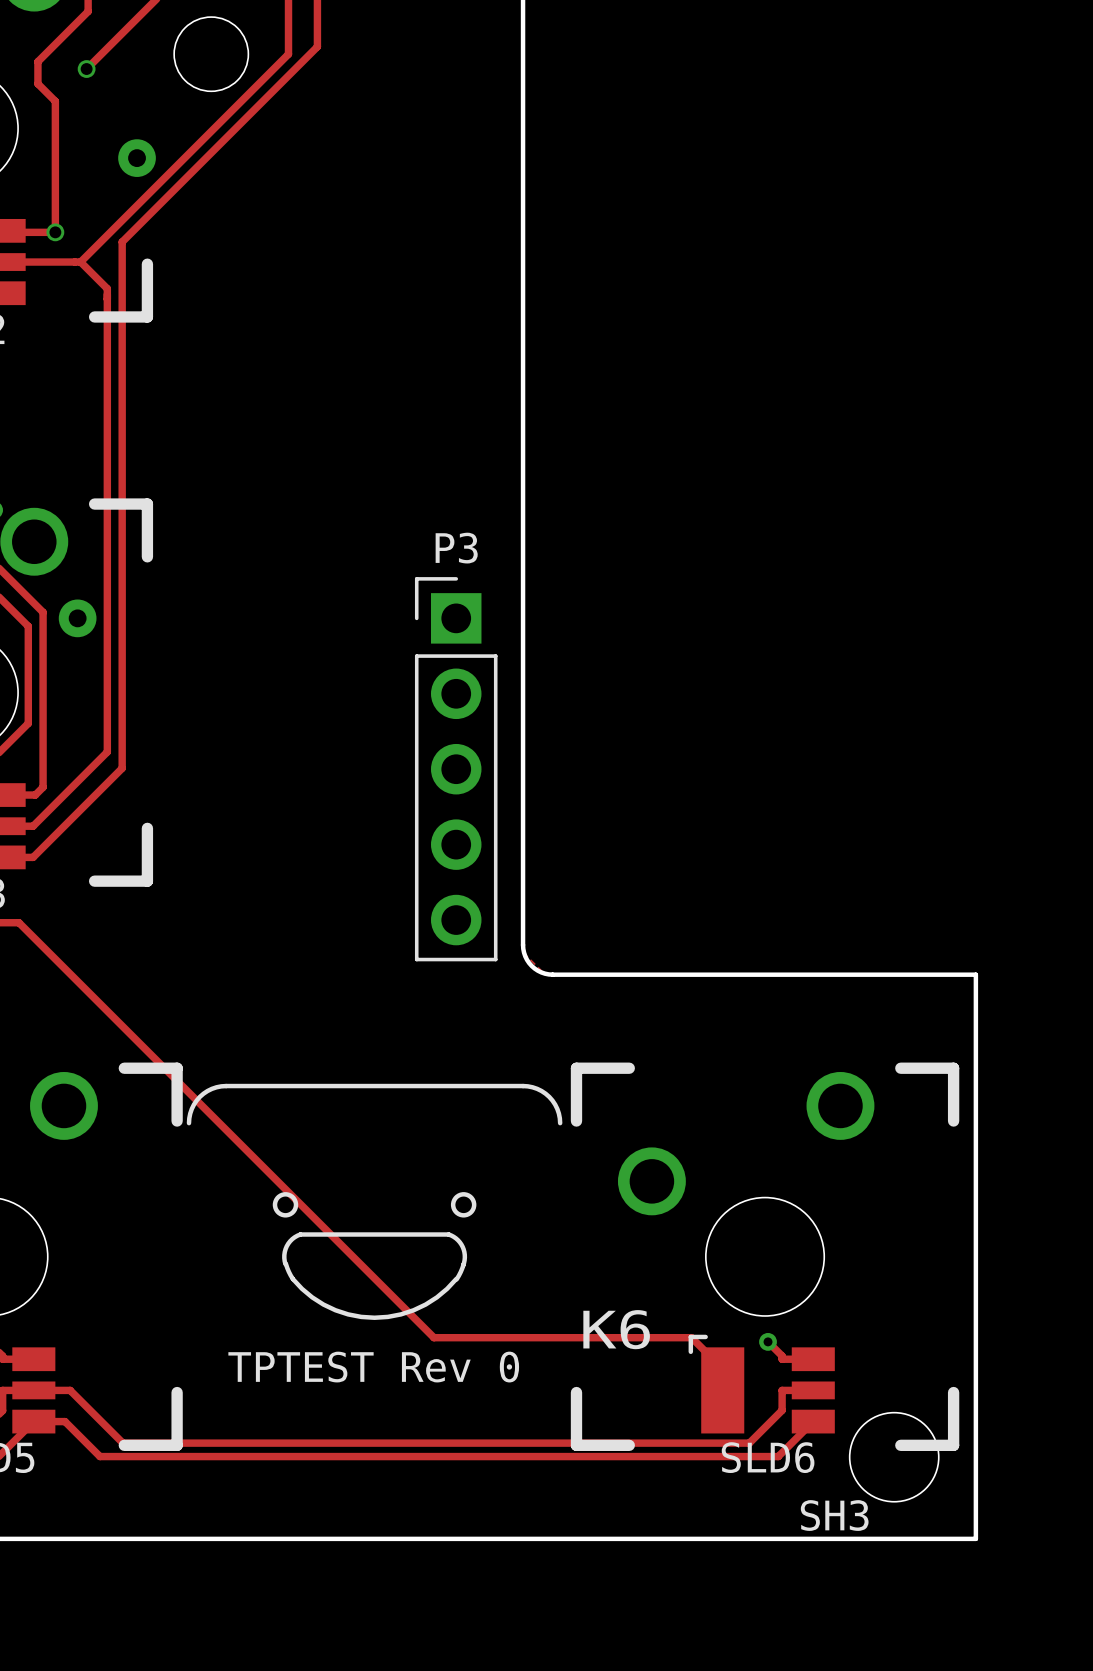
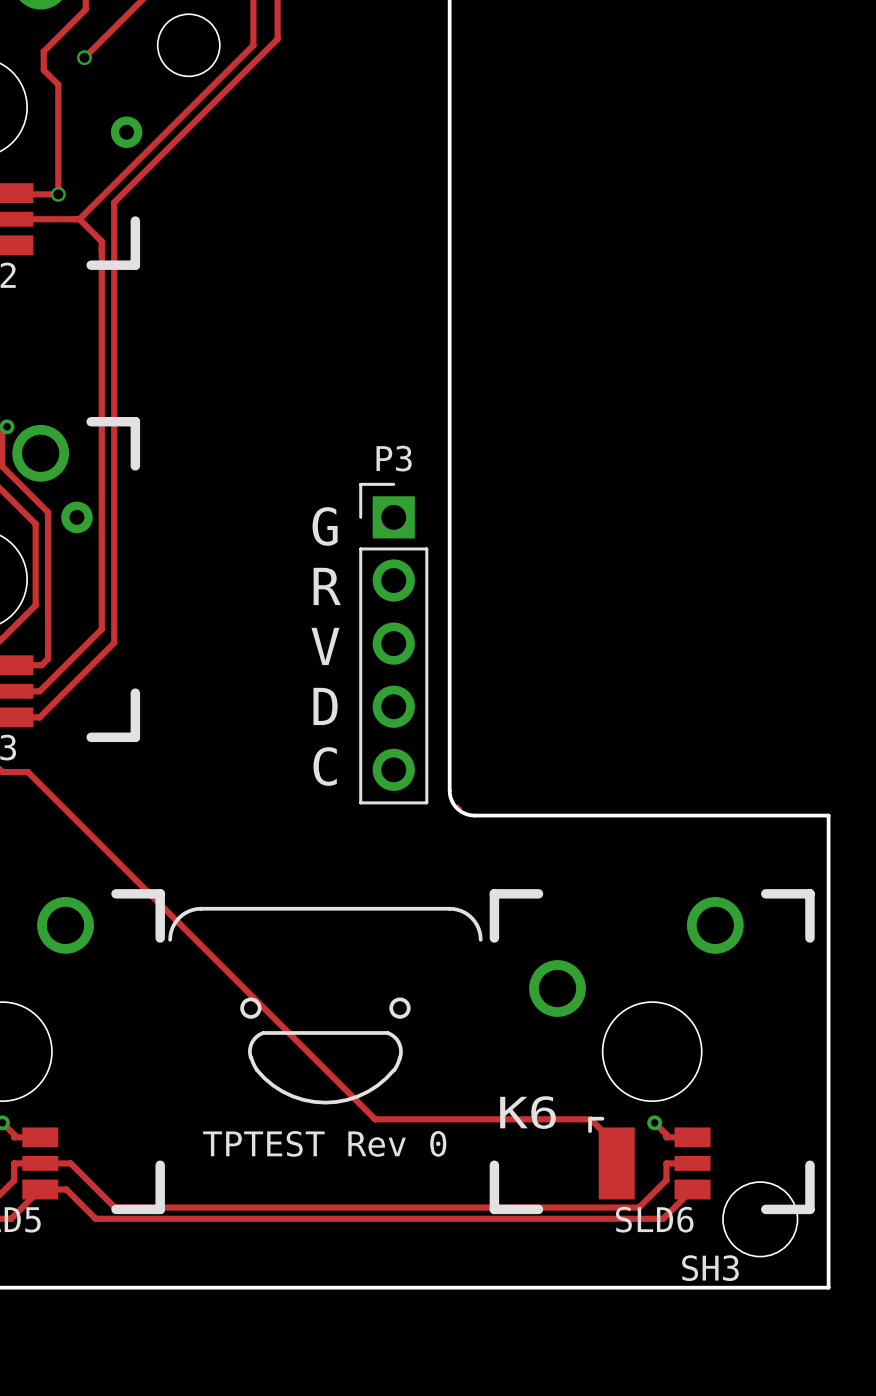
text: none -> G (325, 526)
text: none -> R (327, 586)
text: none -> V (325, 646)
text: none -> D (325, 706)
text: none -> C (325, 766)

